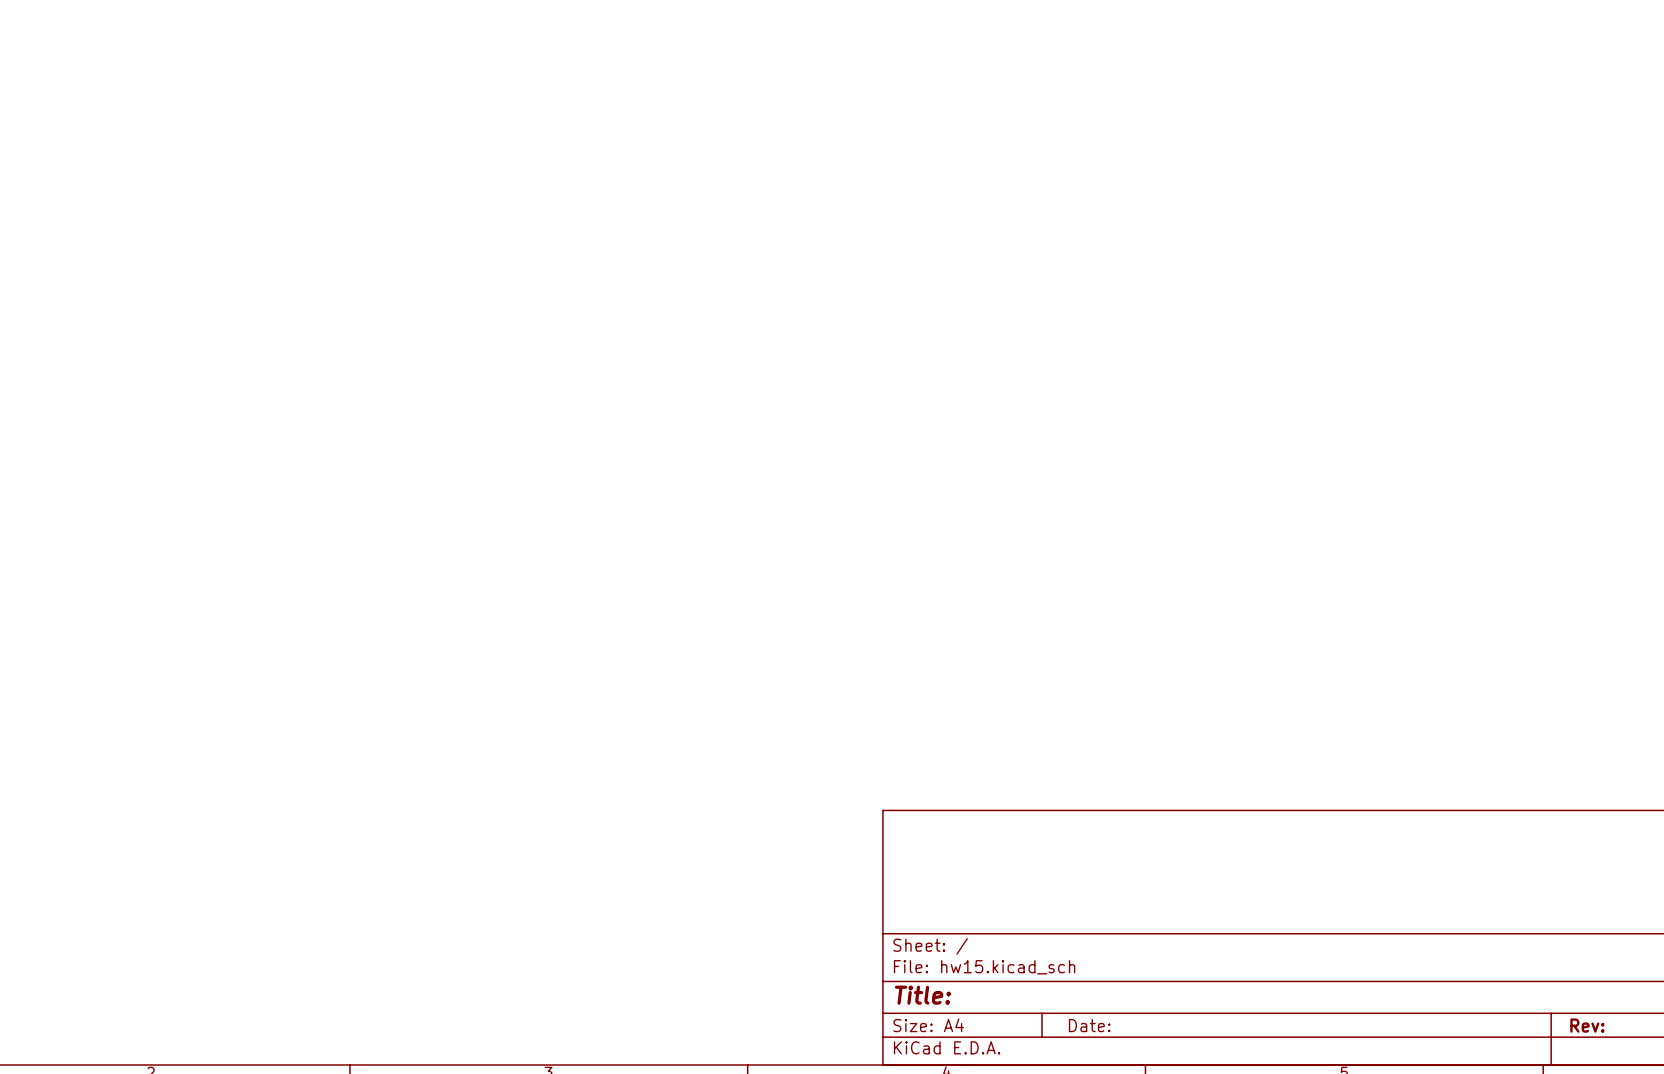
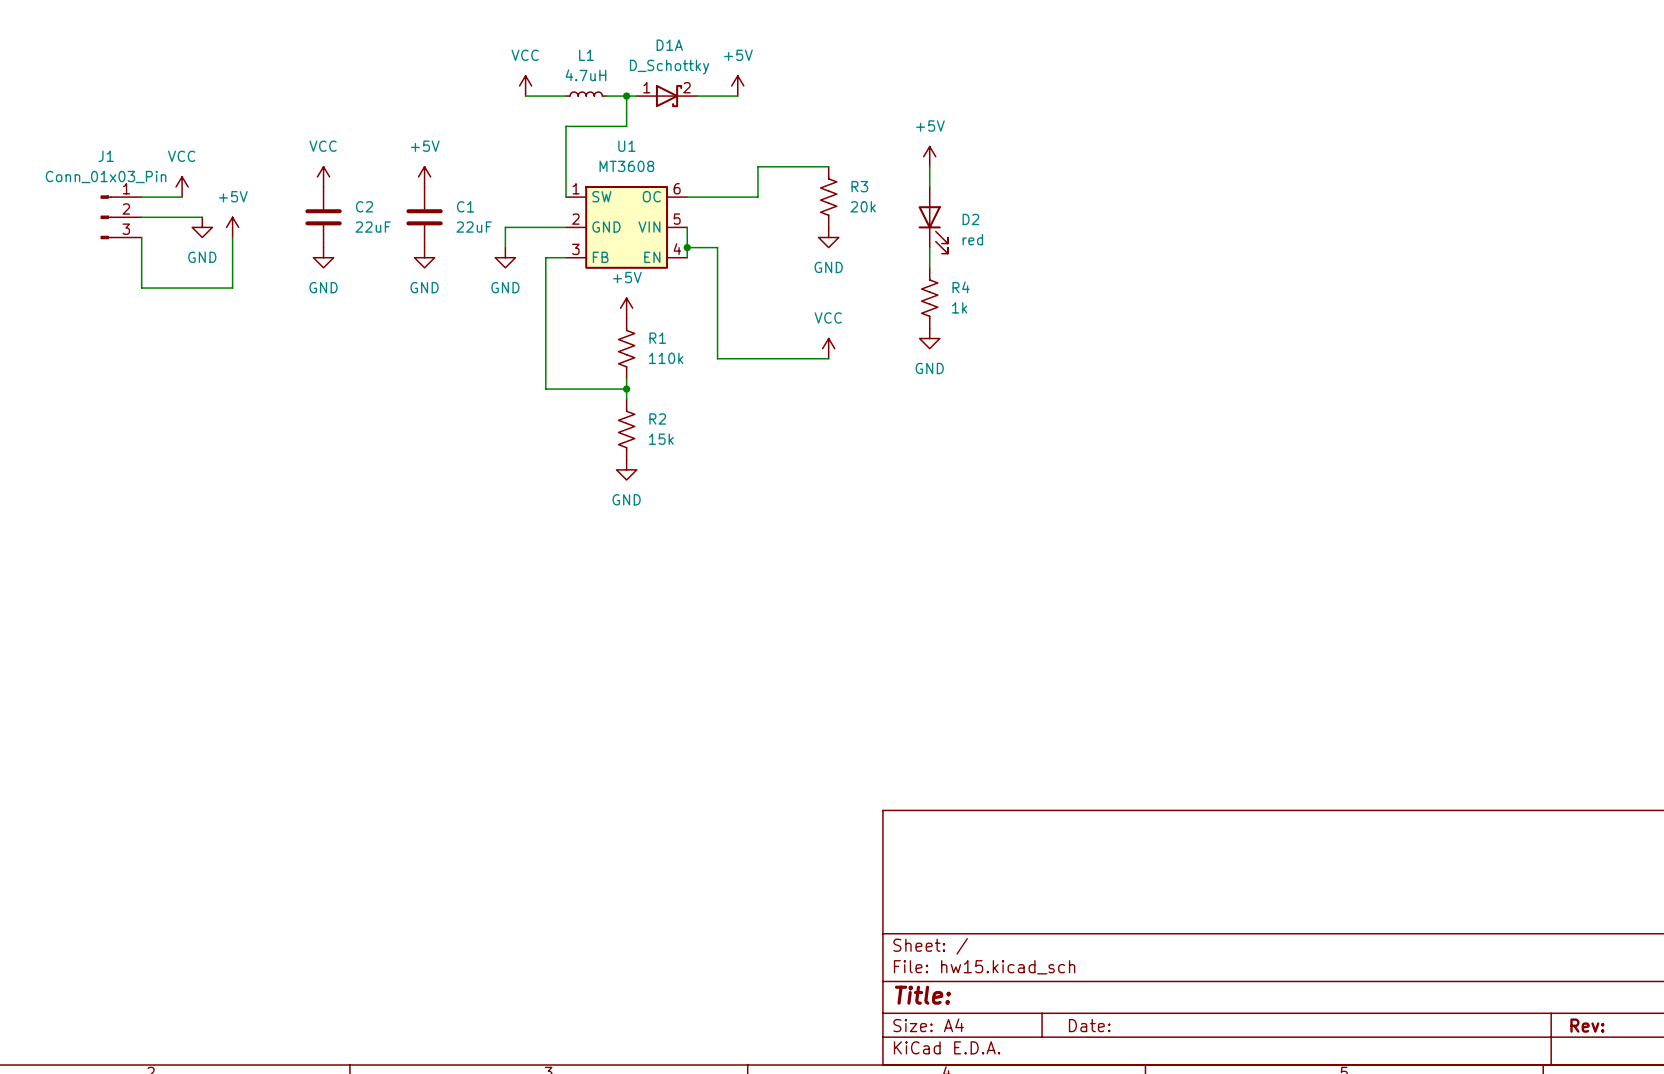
power symbol: none -> VCC (525, 85)
power symbol: none -> +5V (737, 85)
L1: none -> 4.7uH (586, 94)
wire: none -> (525, 96) (566, 96)
wire: none -> (606, 96) (636, 96)
wire: none -> (626, 96) (626, 126) (566, 126) (566, 197)
junction: none -> (626, 96)
D1A: none -> D_Schottky (667, 96)
wire: none -> (697, 96) (737, 96)
power symbol: none -> +5V (929, 156)
wire: none -> (828, 166) (757, 166) (757, 197) (687, 197)
wire: none -> (929, 166) (929, 186)
power symbol: none -> VCC (323, 176)
power symbol: none -> +5V (424, 176)
power symbol: none -> VCC (182, 186)
wire: none -> (141, 197) (182, 197)
R3: none -> 20k (828, 197)
J1: none -> Conn_01x03_Pin (121, 217)
wire: none -> (141, 217) (202, 217)
C2: none -> 22uF (323, 217)
C1: none -> 22uF (424, 217)
D2: none -> red (933, 220)
power symbol: none -> GND (202, 227)
power symbol: none -> +5V (232, 227)
wire: none -> (566, 227) (505, 227) (505, 247)
U1: none -> MT3608 (626, 227)
wire: none -> (687, 227) (687, 257)
wire: none -> (141, 237) (141, 288) (232, 288) (232, 237)
power symbol: none -> GND (828, 237)
wire: none -> (687, 247) (717, 247) (717, 358) (828, 358)
junction: none -> (687, 247)
wire: none -> (929, 247) (929, 267)
power symbol: none -> GND (323, 257)
power symbol: none -> GND (424, 257)
power symbol: none -> GND (505, 257)
wire: none -> (566, 257) (545, 257) (545, 389) (626, 389)
R4: none -> 1k (929, 298)
power symbol: none -> +5V (626, 308)
power symbol: none -> GND (929, 338)
R1: none -> 110k (626, 348)
power symbol: none -> VCC (828, 348)
wire: none -> (626, 378) (626, 399)
junction: none -> (626, 389)
R2: none -> 15k (626, 429)
power symbol: none -> GND (626, 469)

